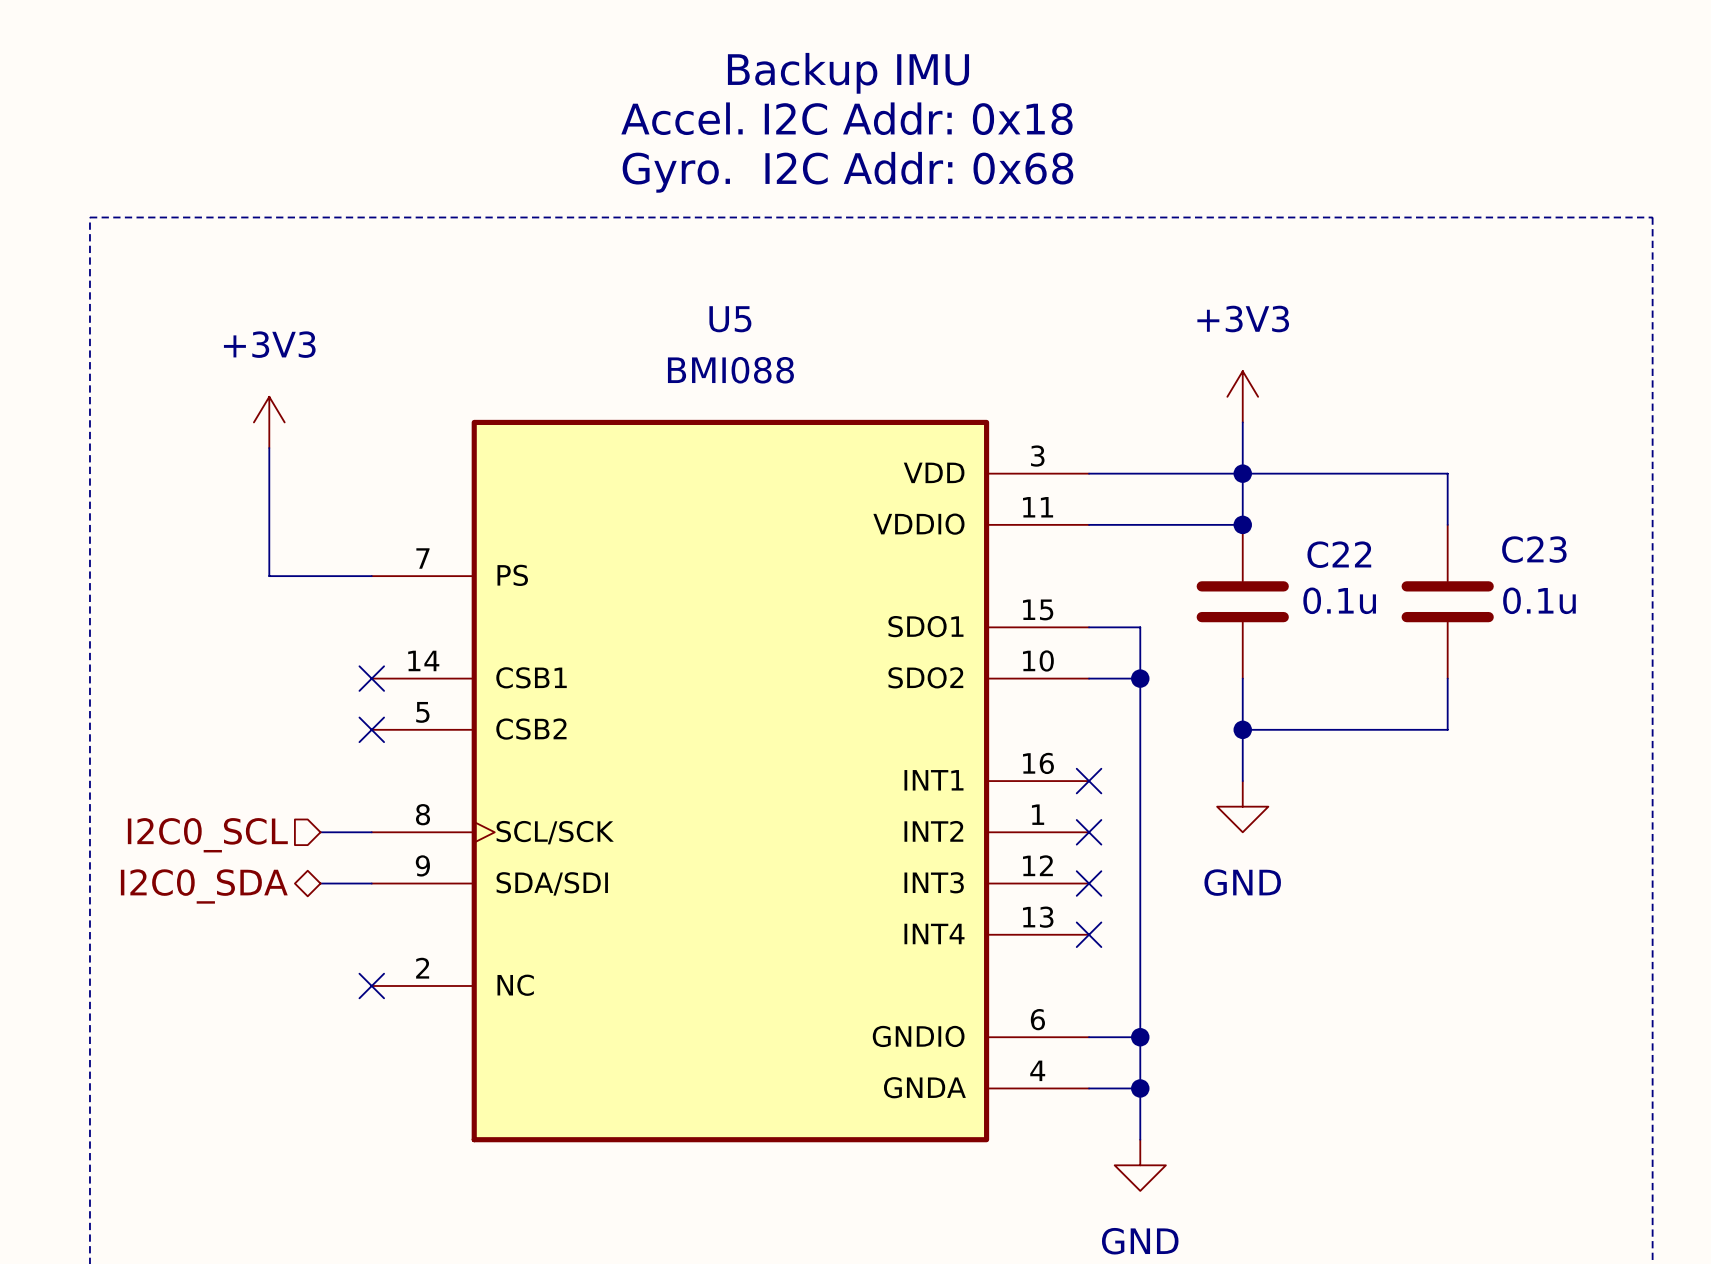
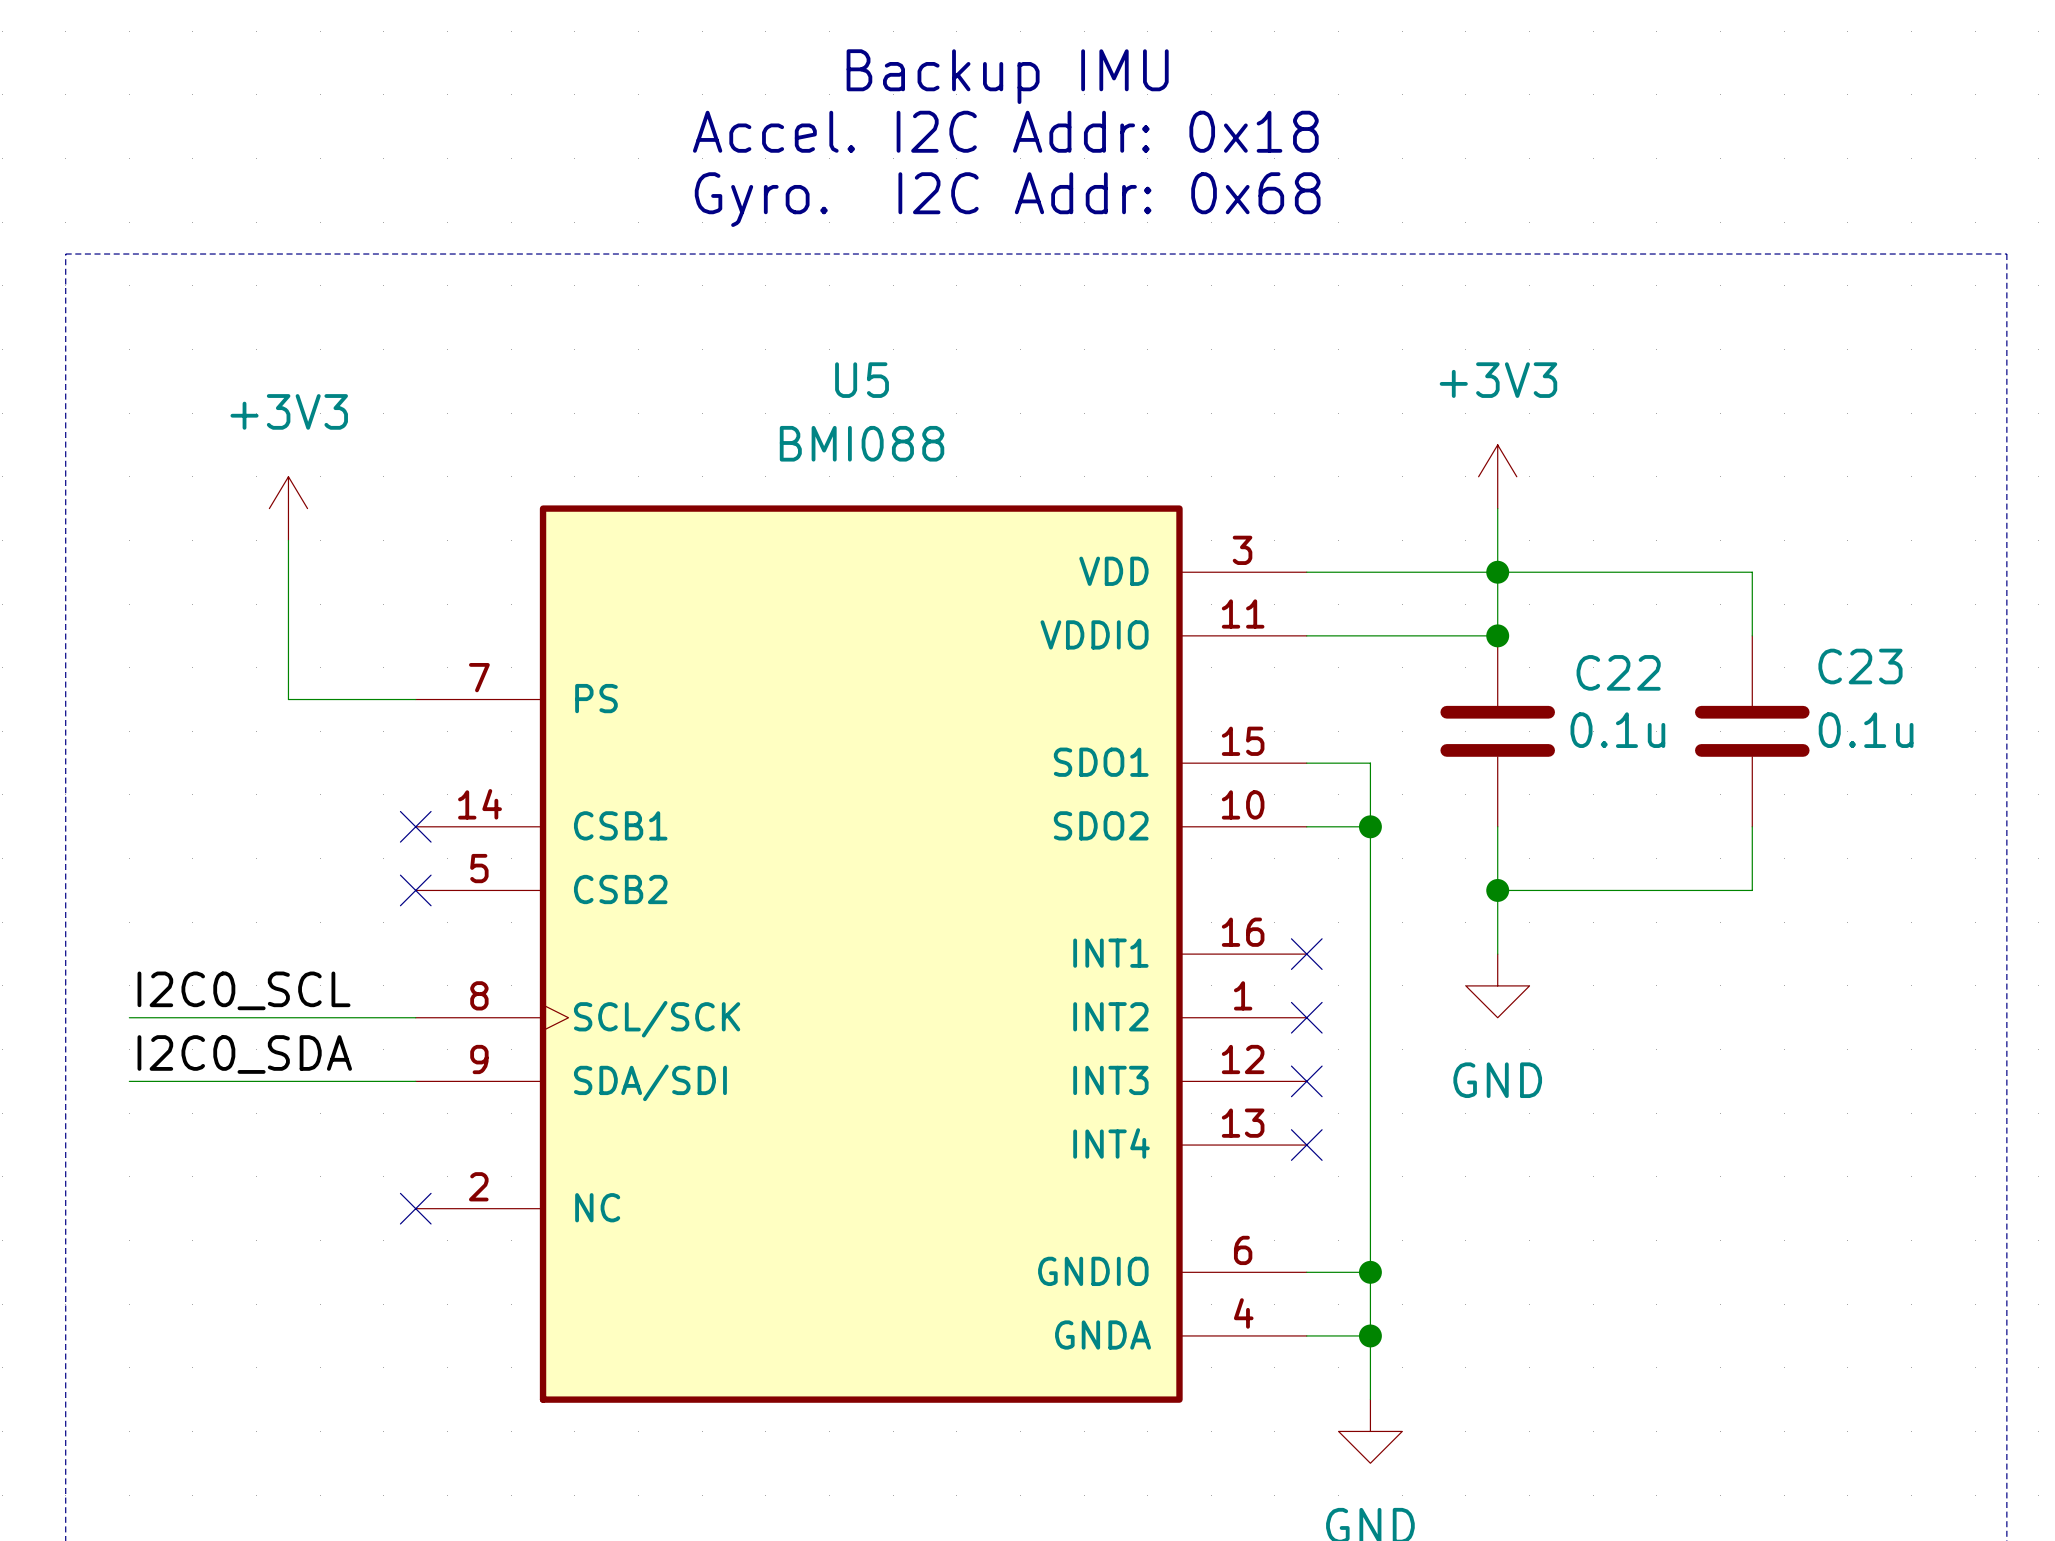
label: none -> I2C0_SCL (244, 990)
wire: none -> (129, 1017) (352, 1017)
hierarchical label: I2C0_SCL (207, 835) -> none
label: none -> I2C0_SDA (244, 1054)
wire: none -> (129, 1081) (352, 1081)
hierarchical label: I2C0_SDA (204, 886) -> none

